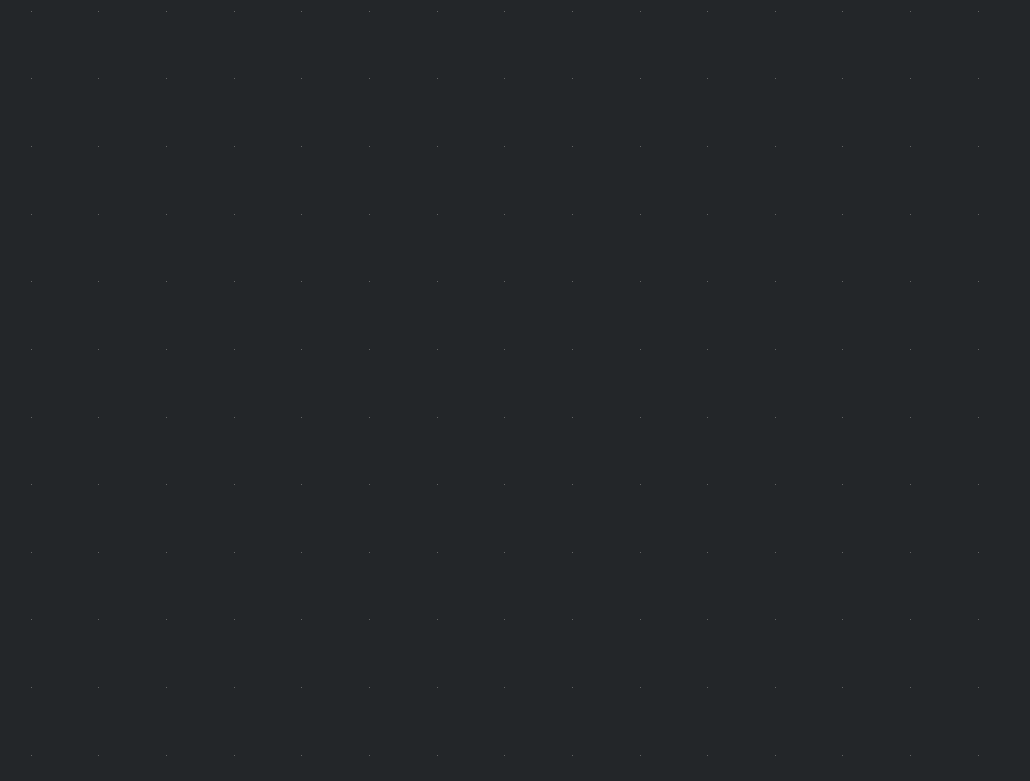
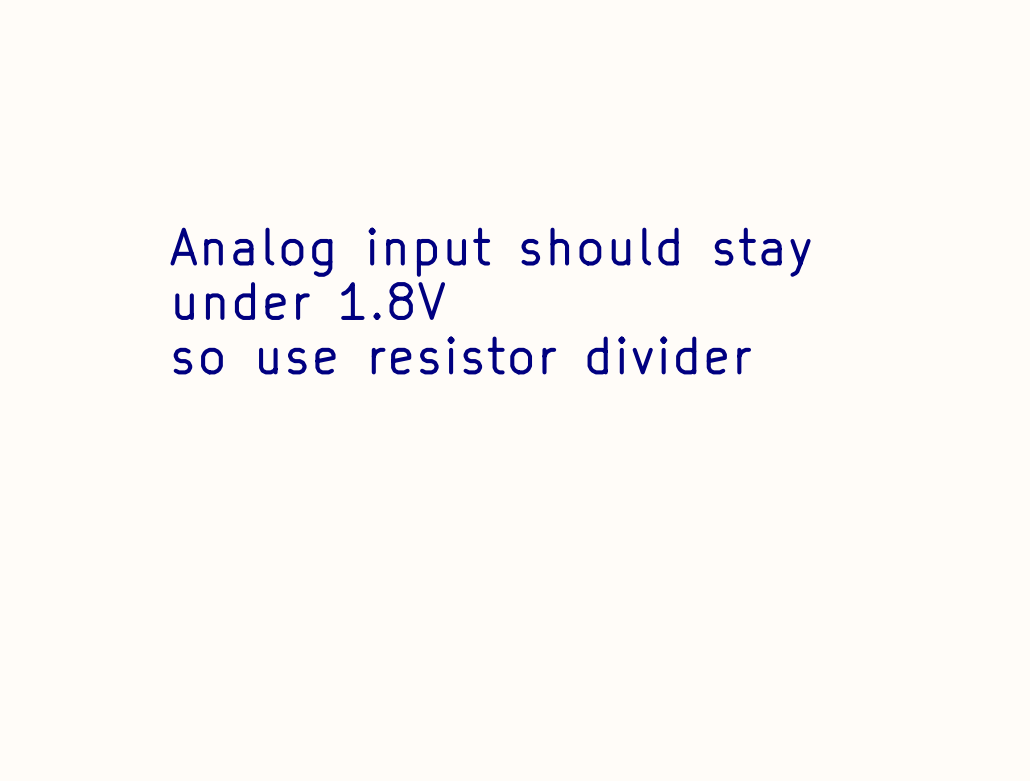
text: none -> Analog input should stay (490, 252)
text: none -> under 1.8V (310, 301)
text: none -> so use resistor divider (462, 355)

